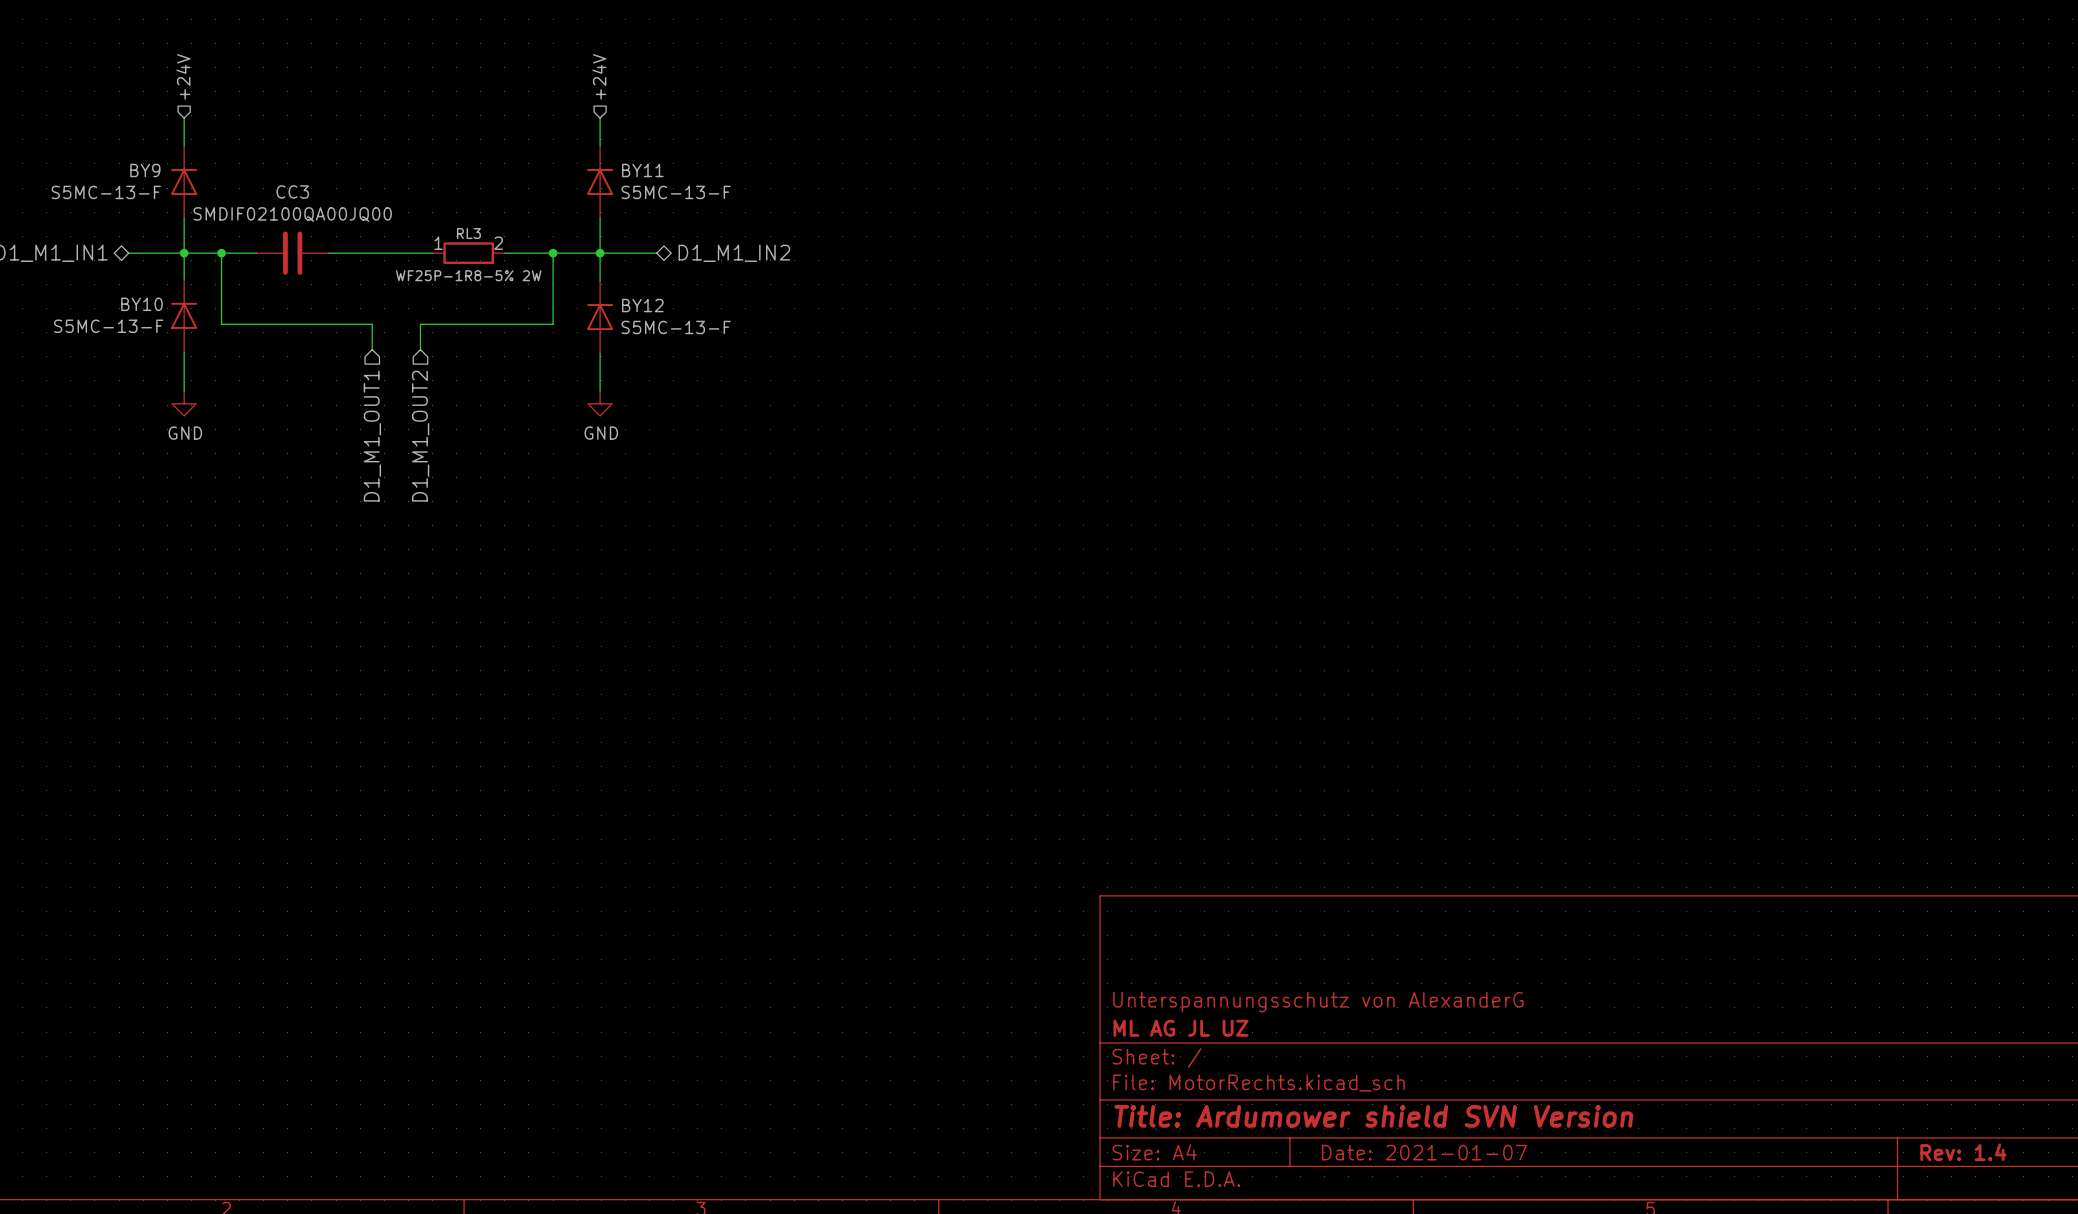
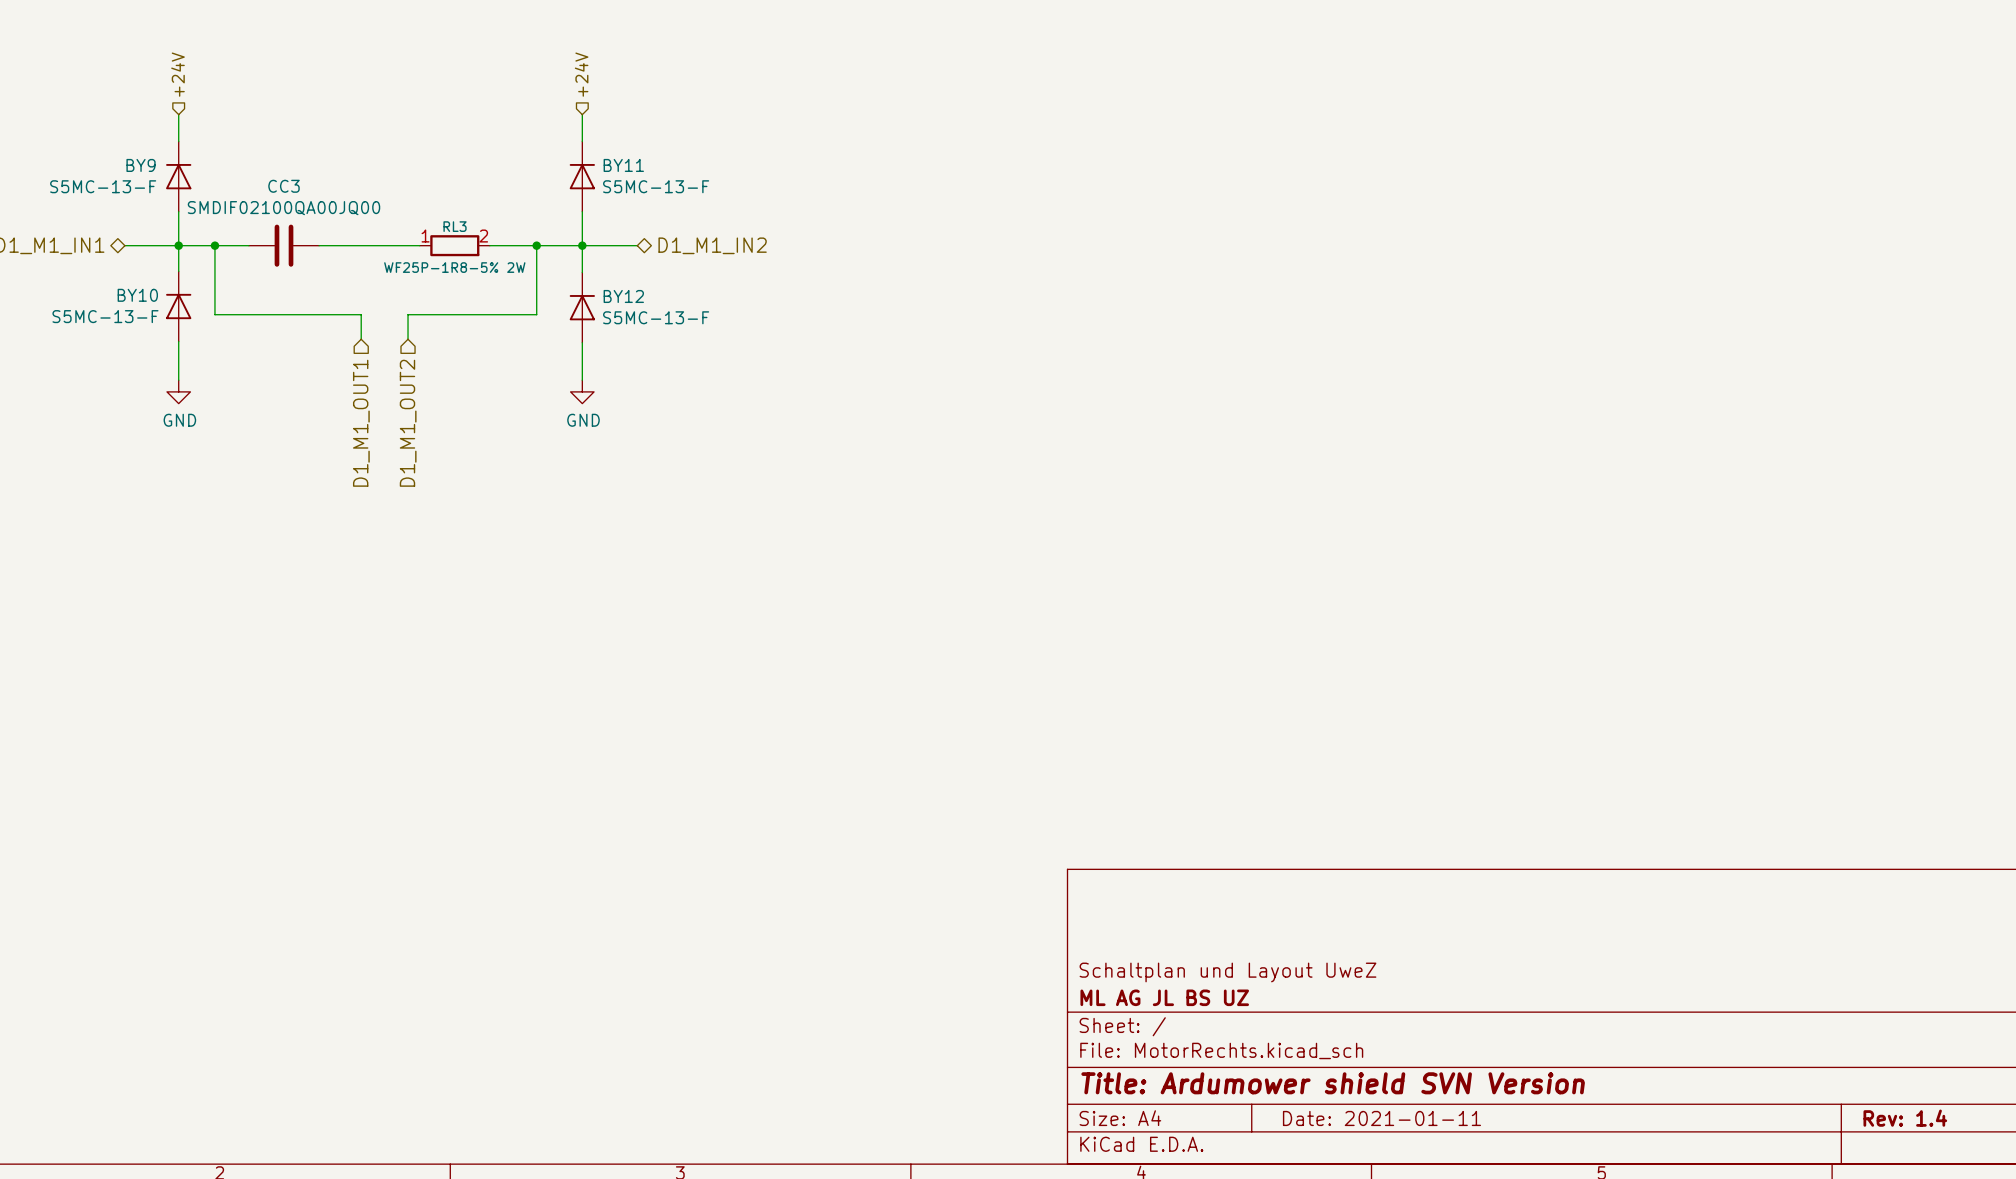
title block: Unterspannungsschutz von AlexanderG (1318, 1002) -> Schaltplan und Layout UweZ (1227, 972)
title block: ML AG JL UZ (1180, 1028) -> ML AG JL BS UZ (1164, 997)
title block: Date: 2021-01-07 (1424, 1152) -> Date: 2021-01-11 (1381, 1118)

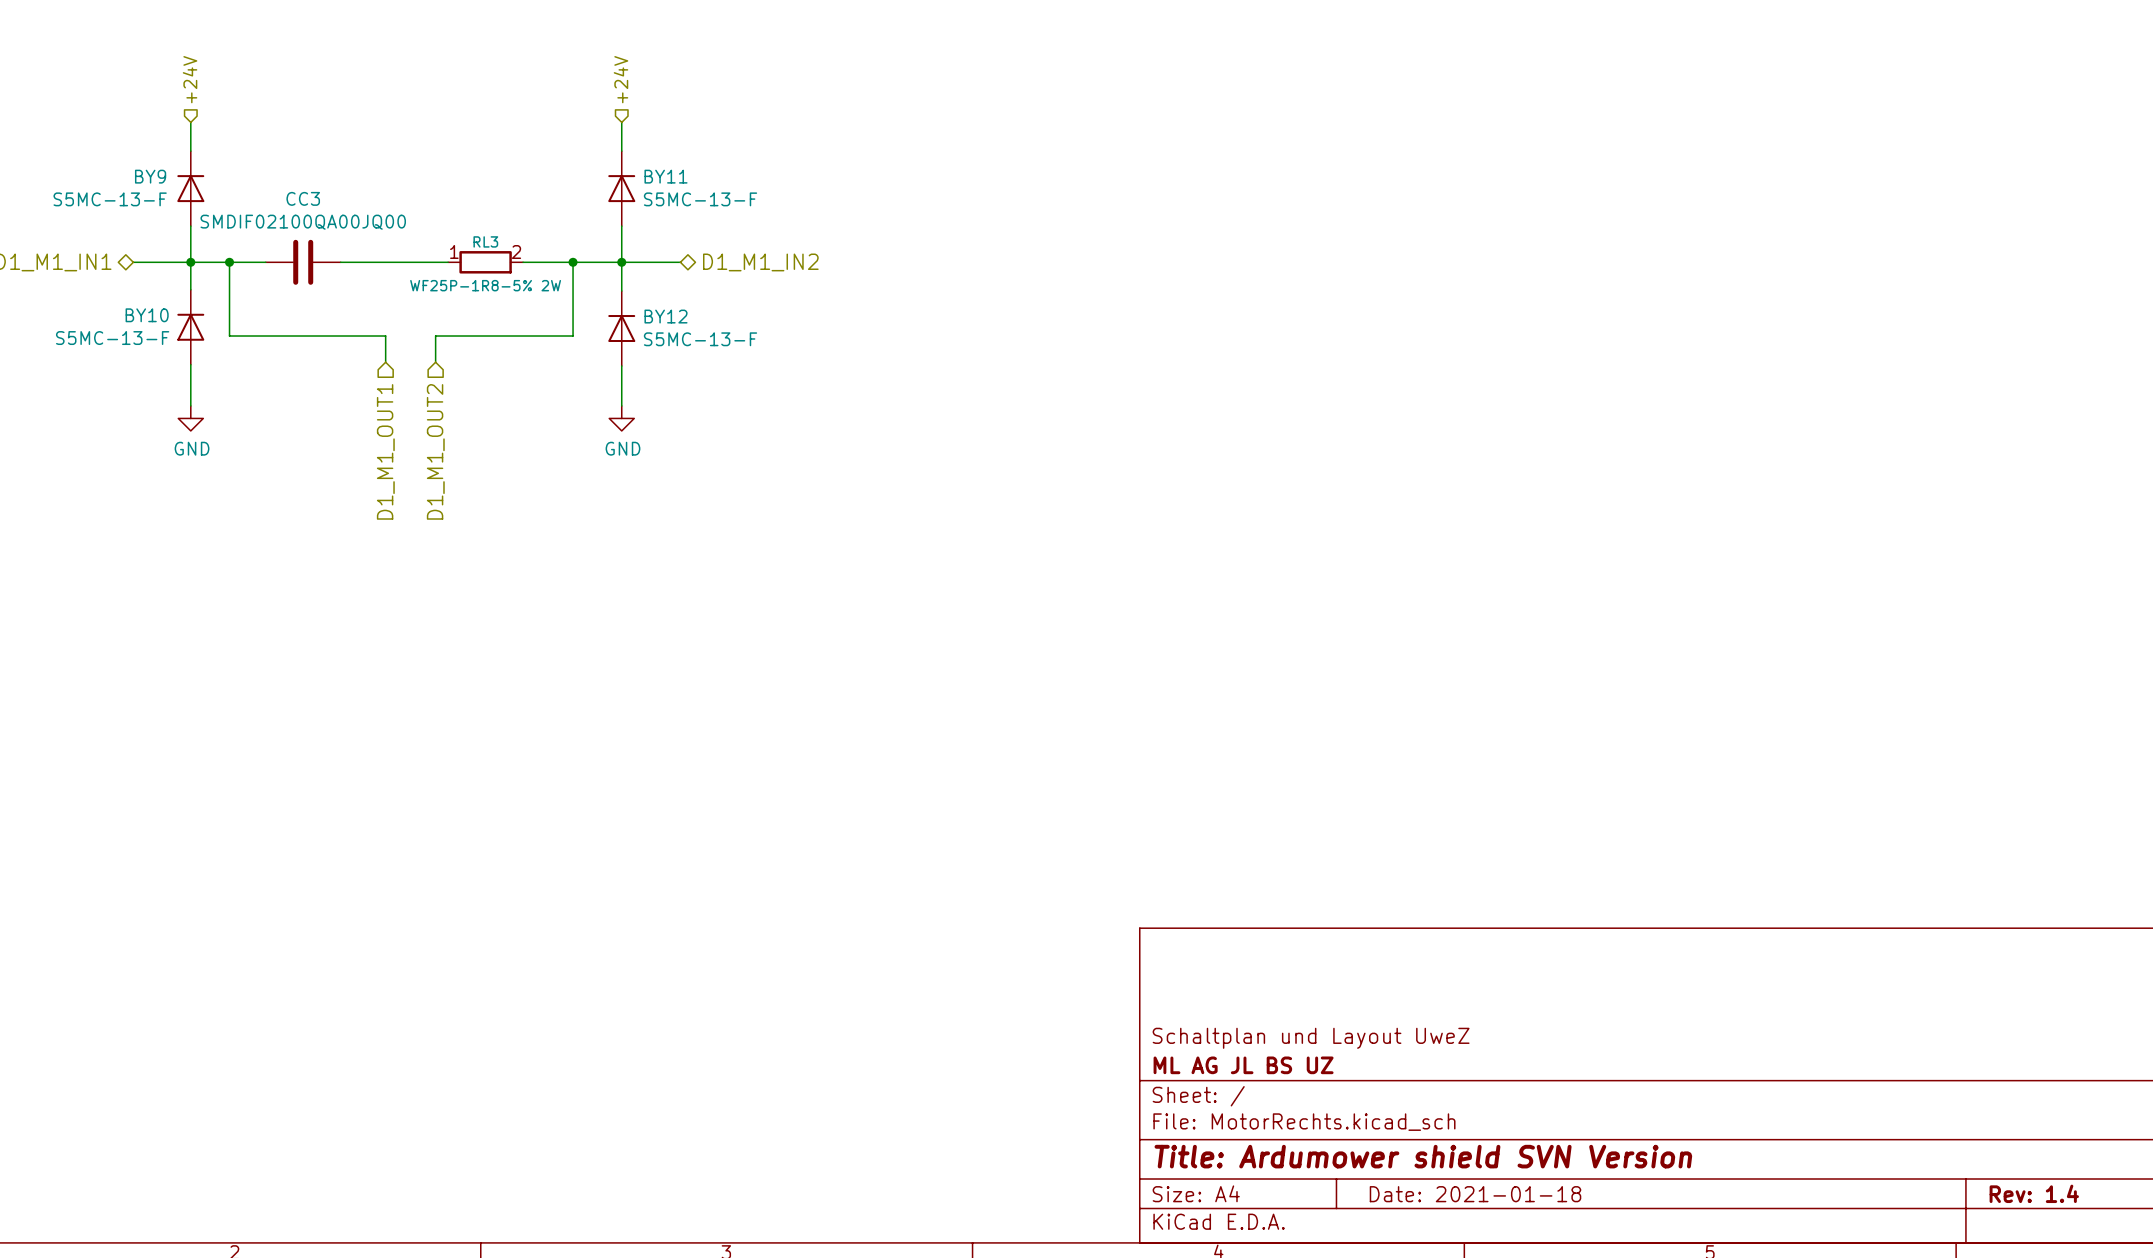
title block: Date: 2021-01-11 (1381, 1118) -> Date: 2021-01-18 (1475, 1194)

